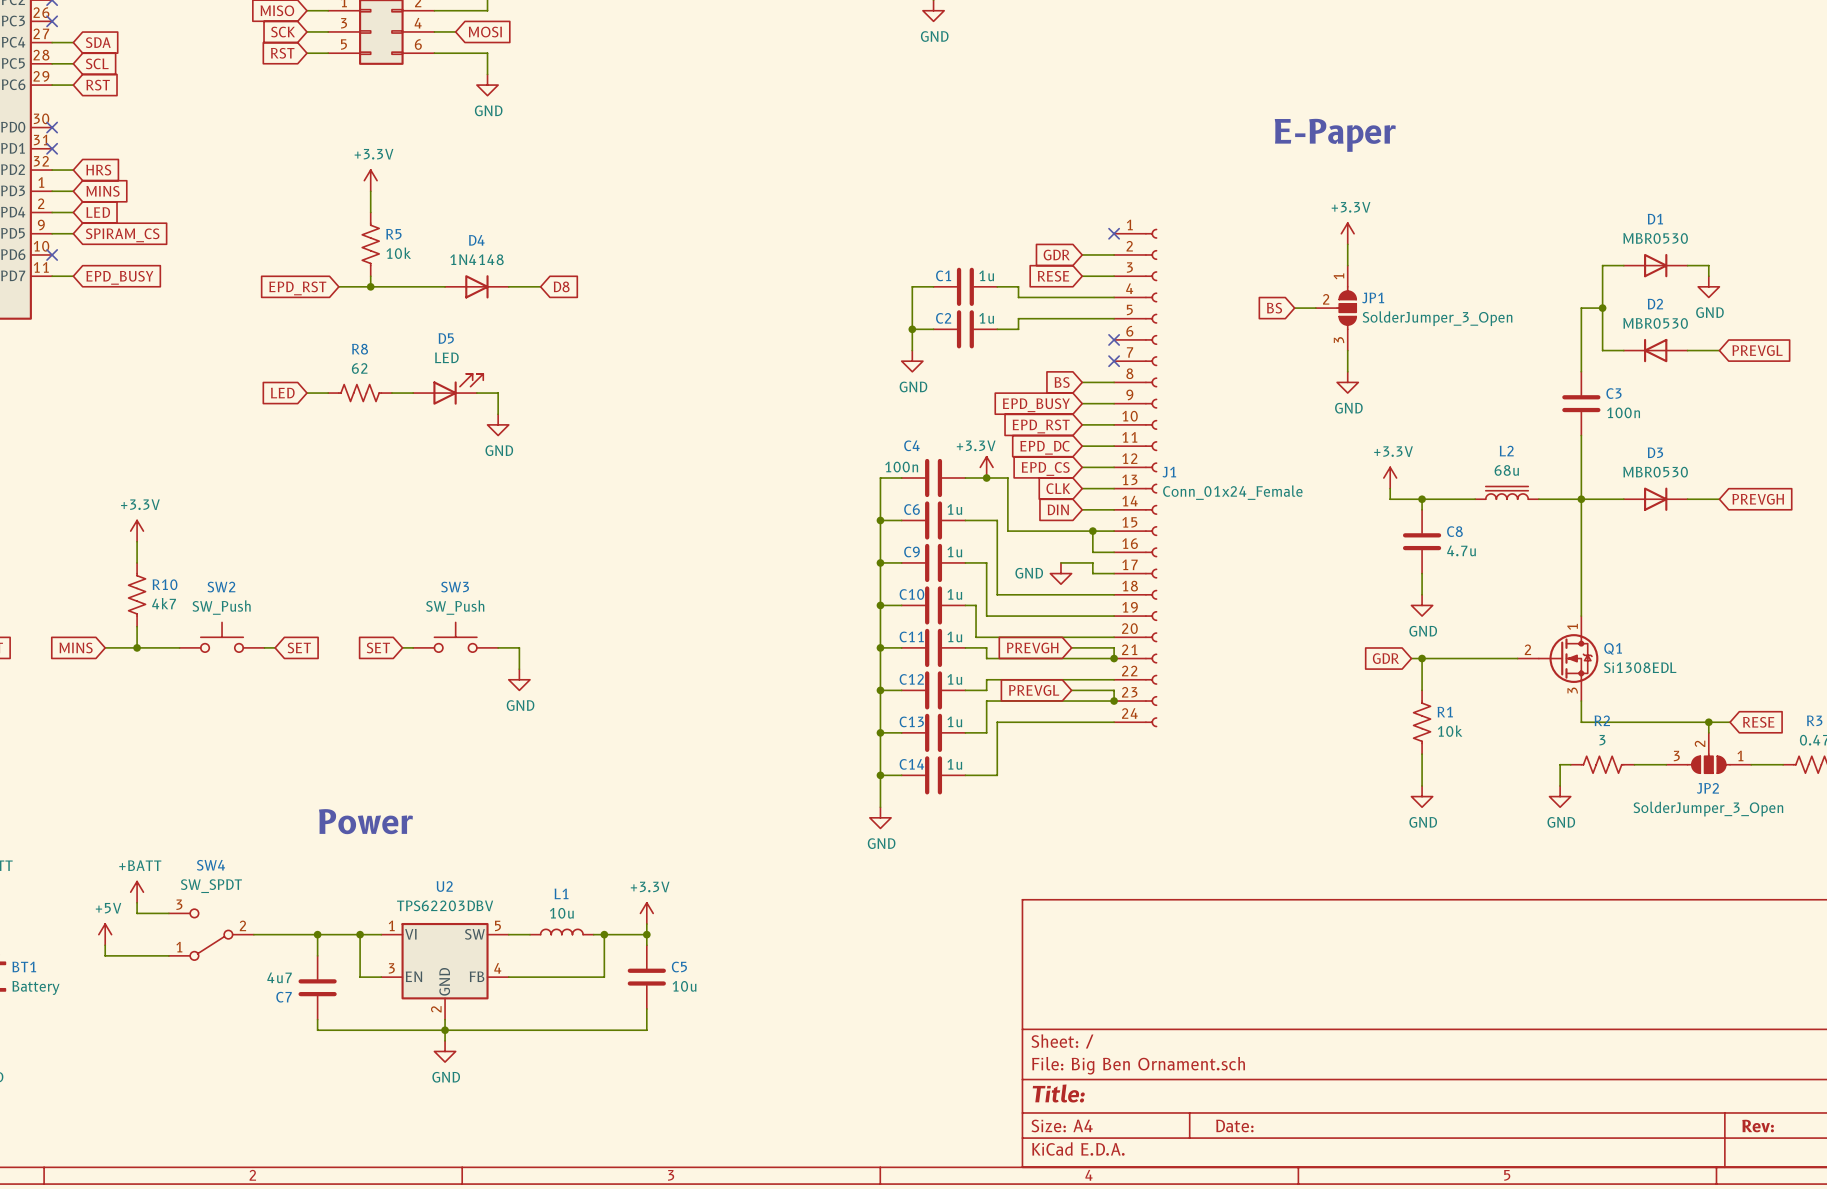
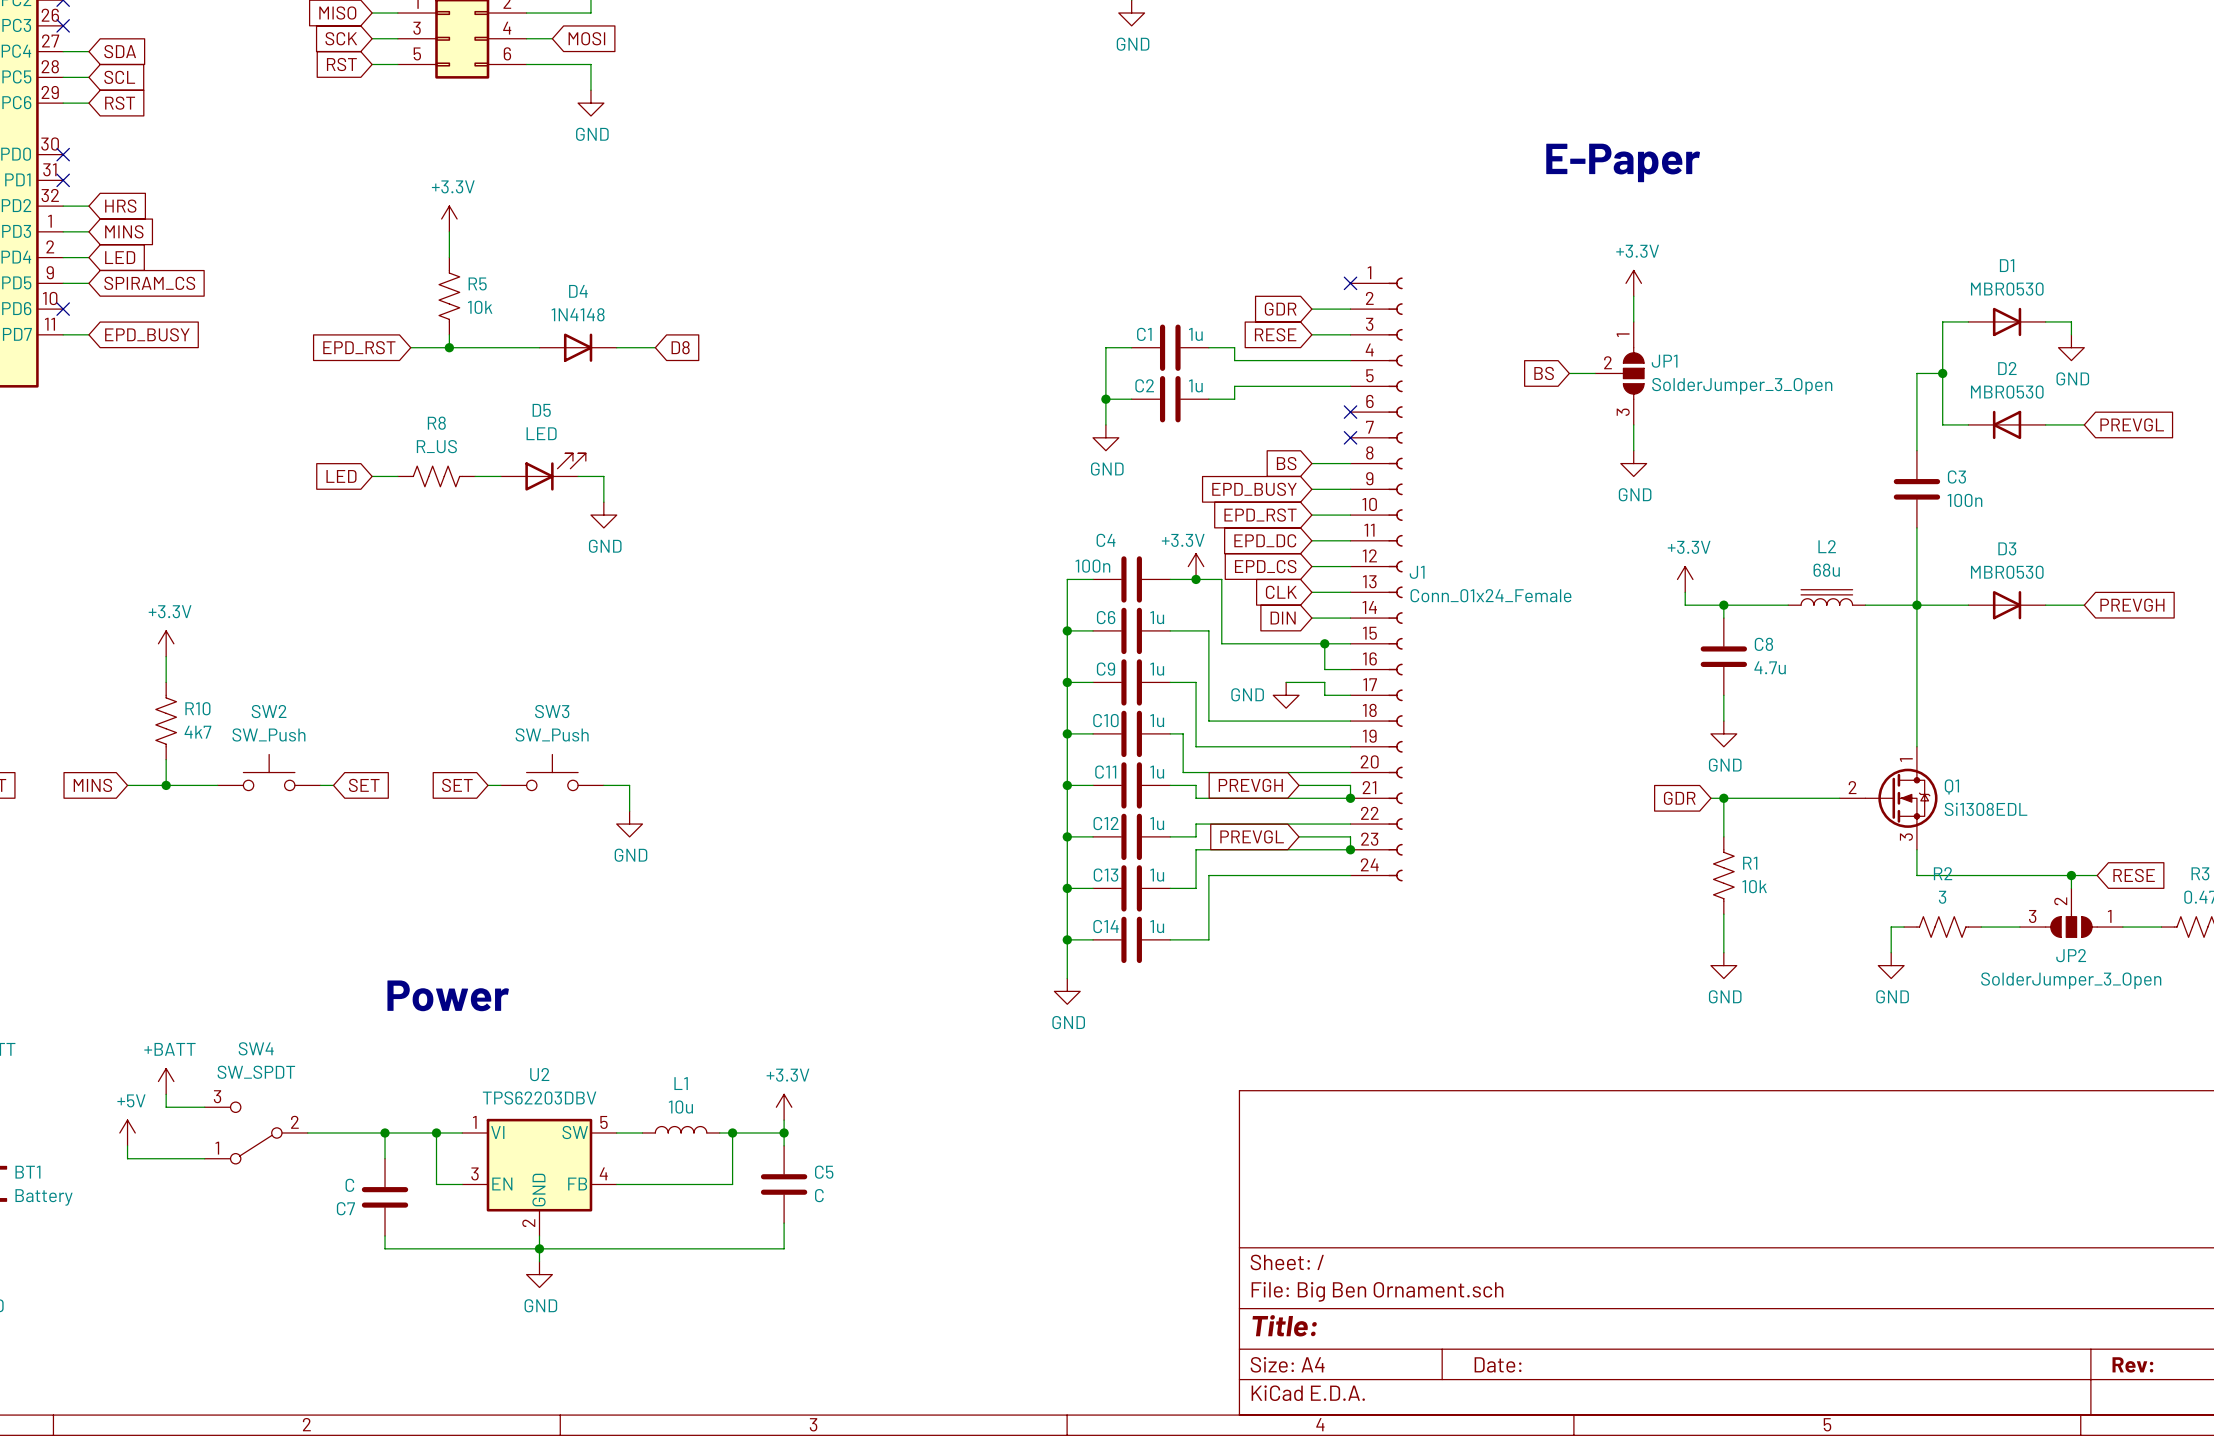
R8 value: 62 (359, 368) -> R_US (436, 446)
C7 value: 4u7 (279, 977) -> C (349, 1185)
C5 value: 10u (684, 986) -> C (819, 1195)

